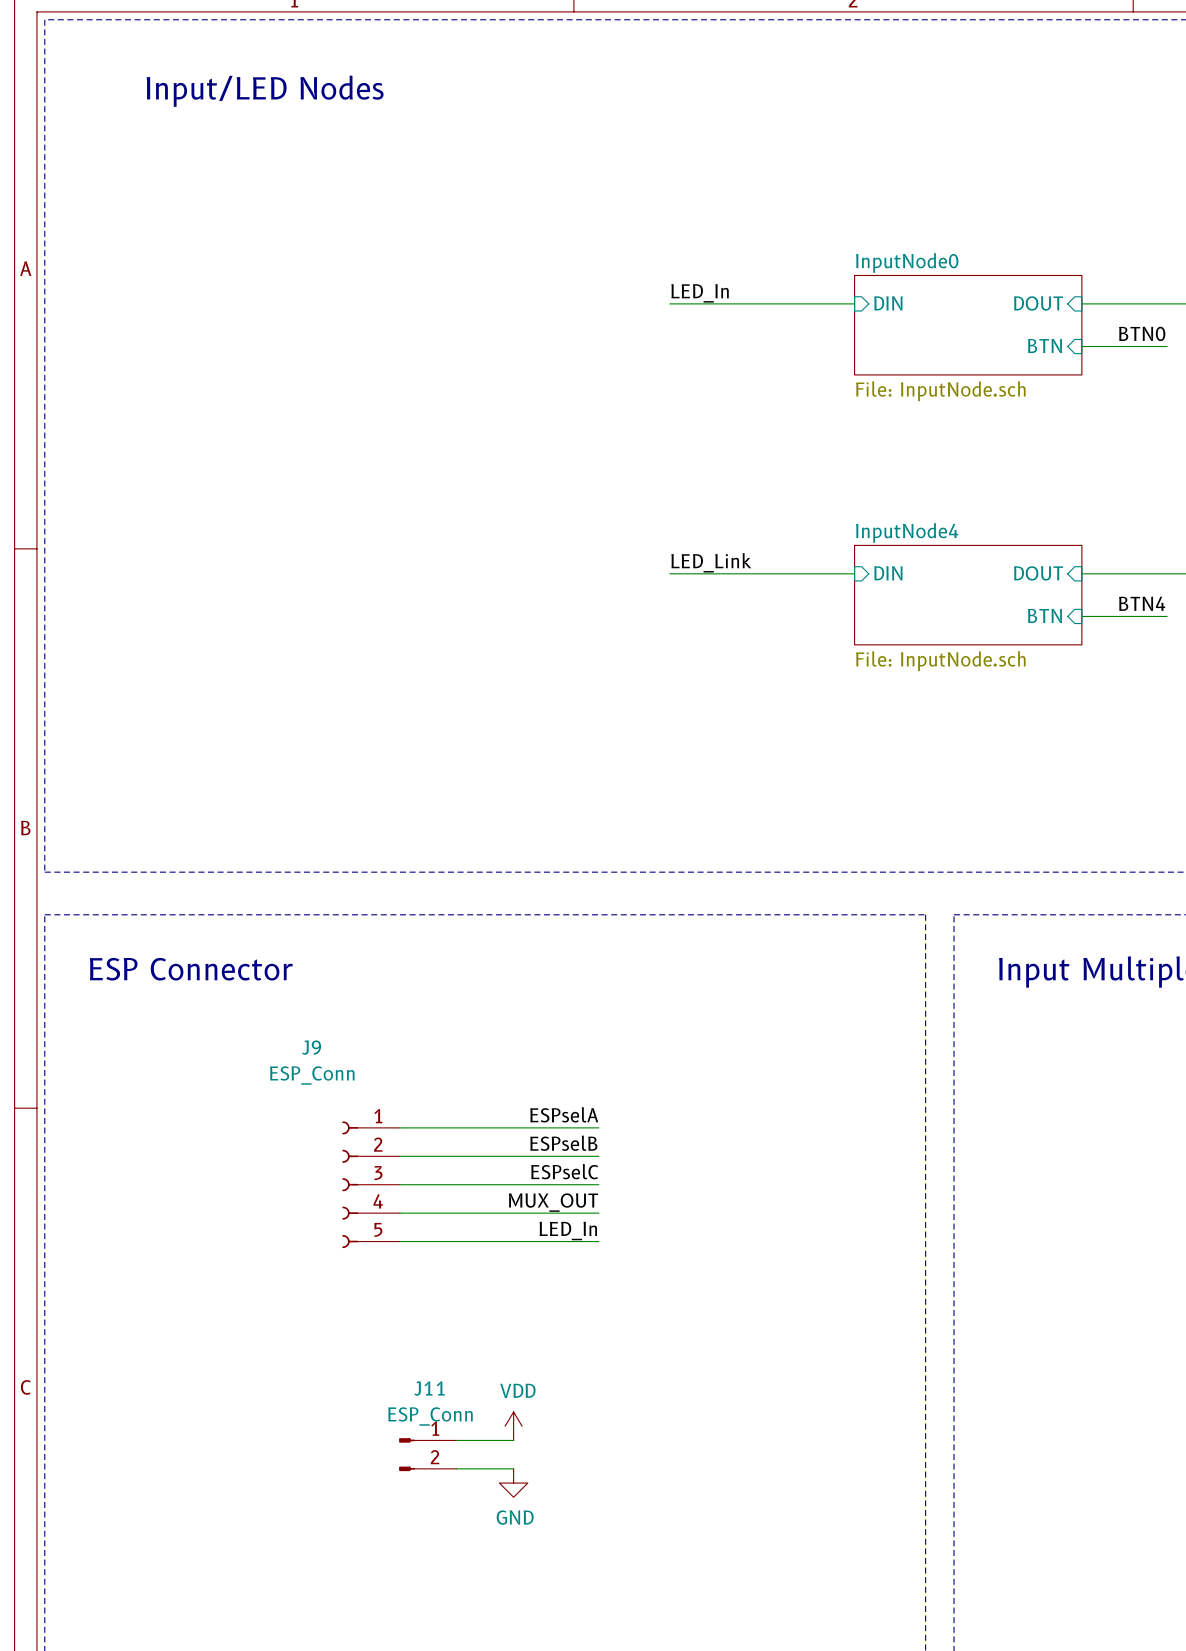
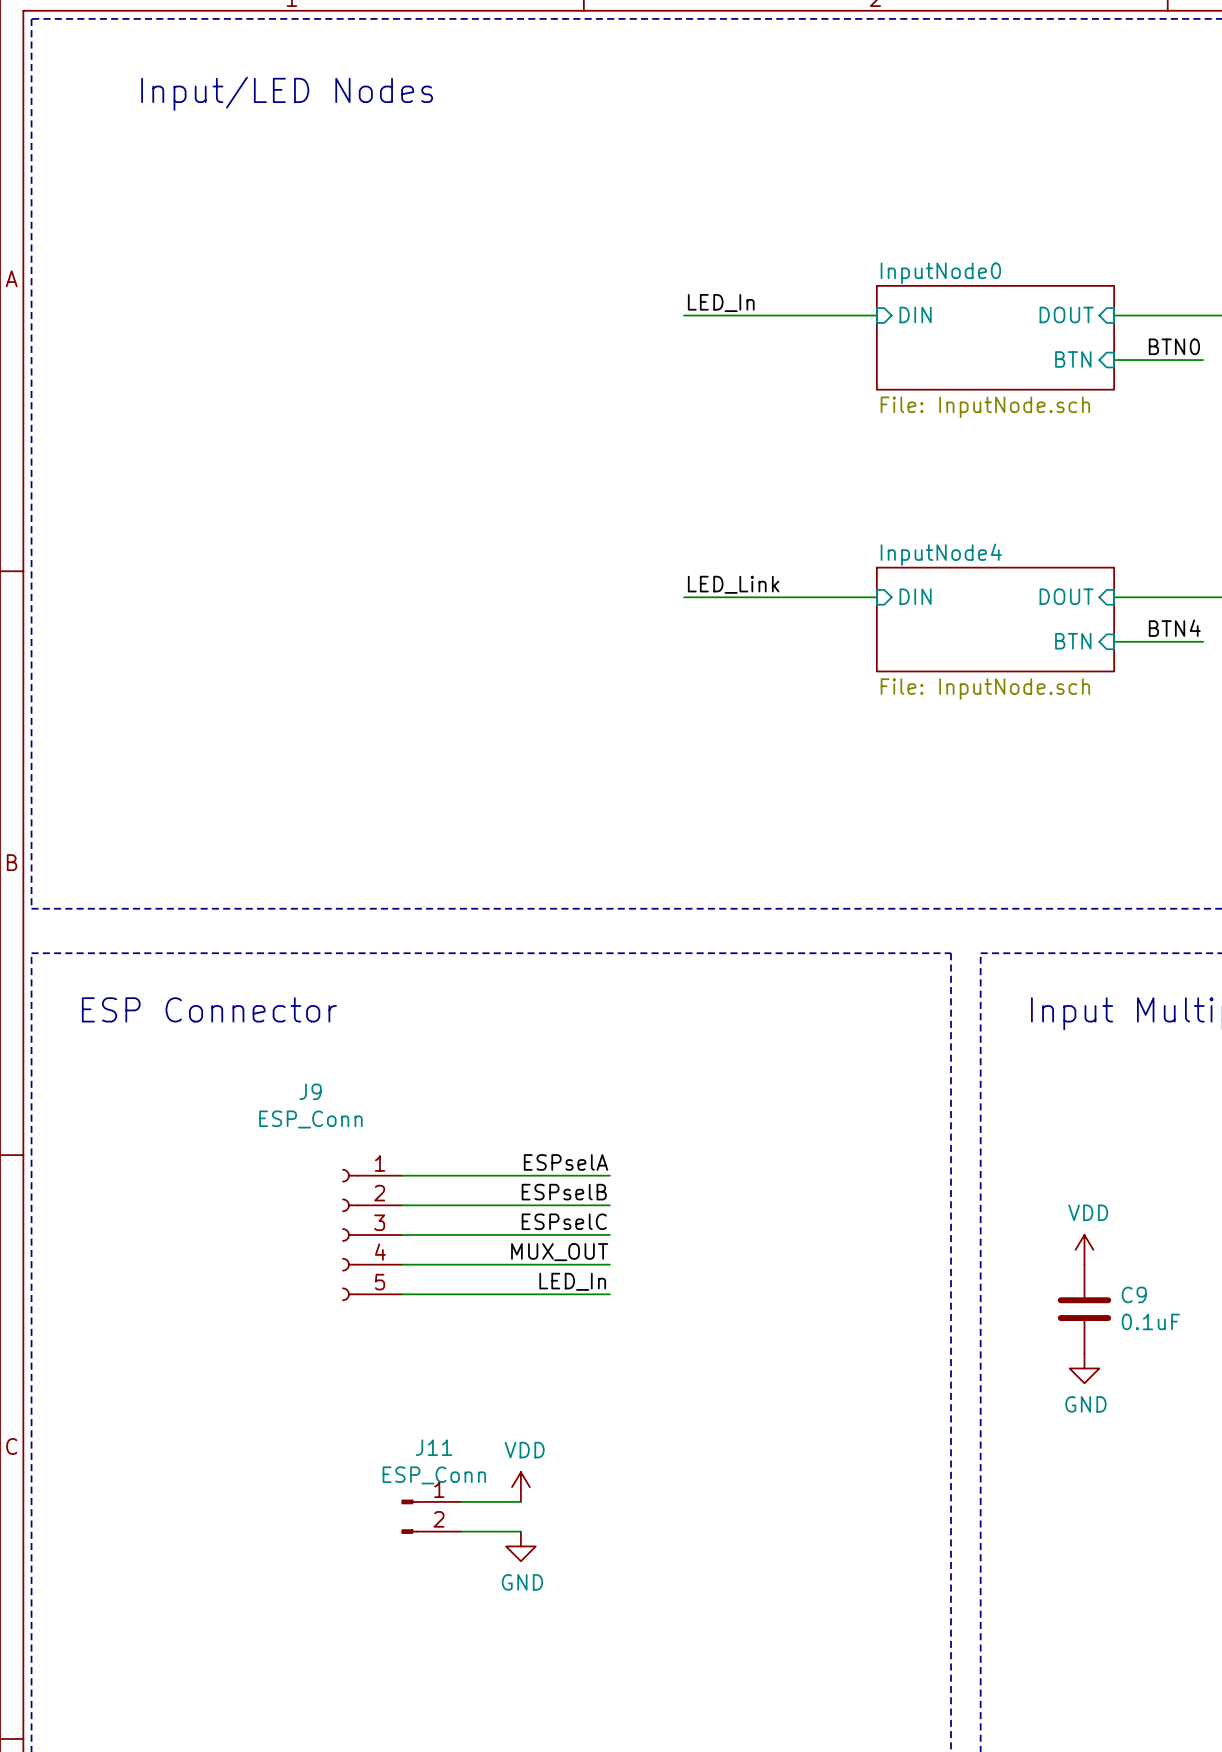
power symbol: none -> VDD (1084, 1249)
C9: none -> 0.1uF (1084, 1309)
power symbol: none -> GND (1084, 1368)

